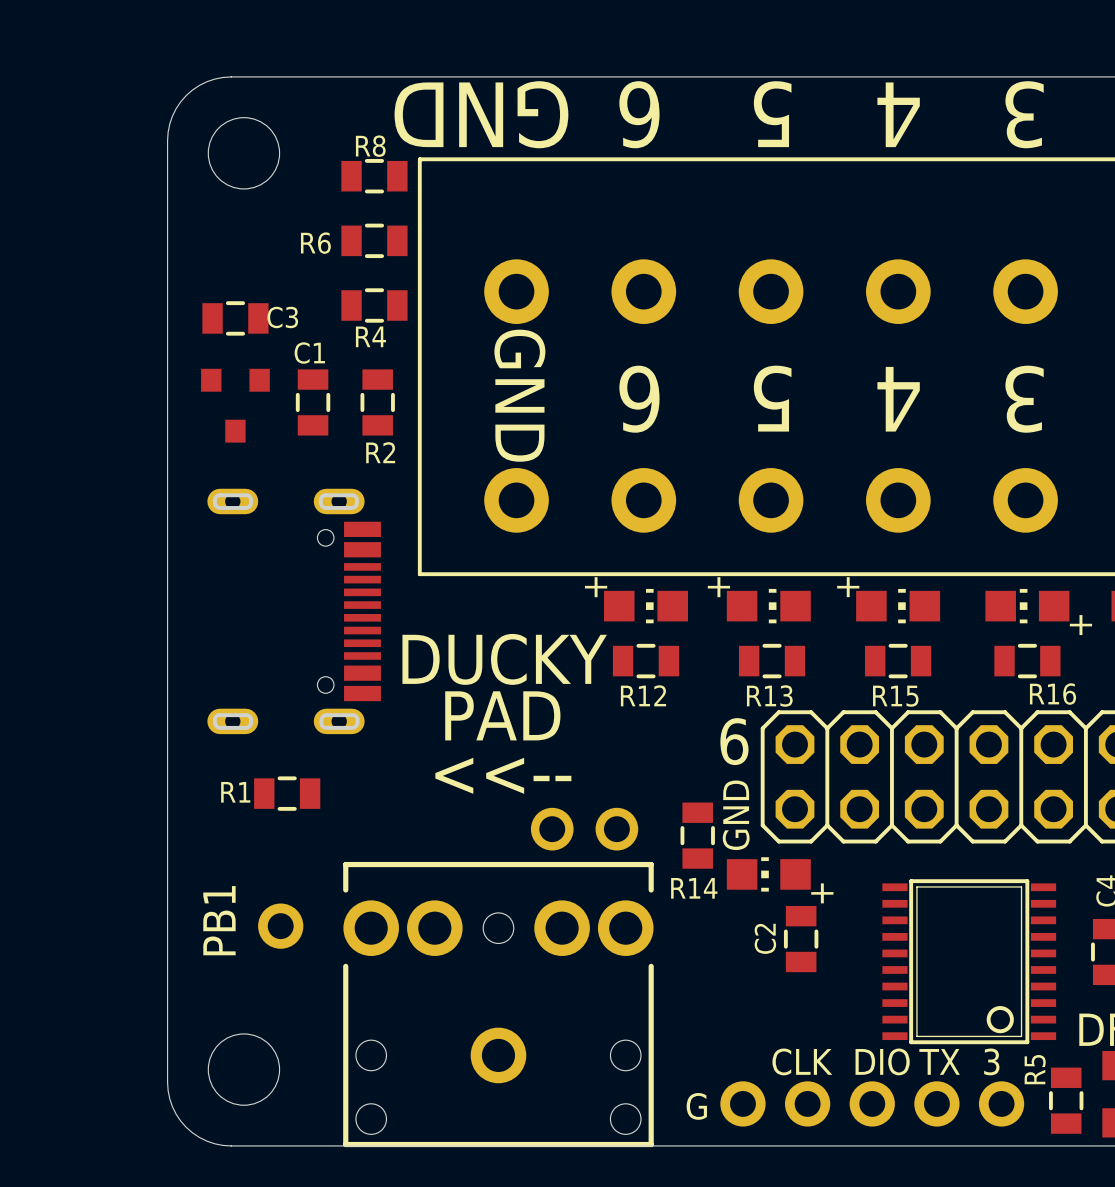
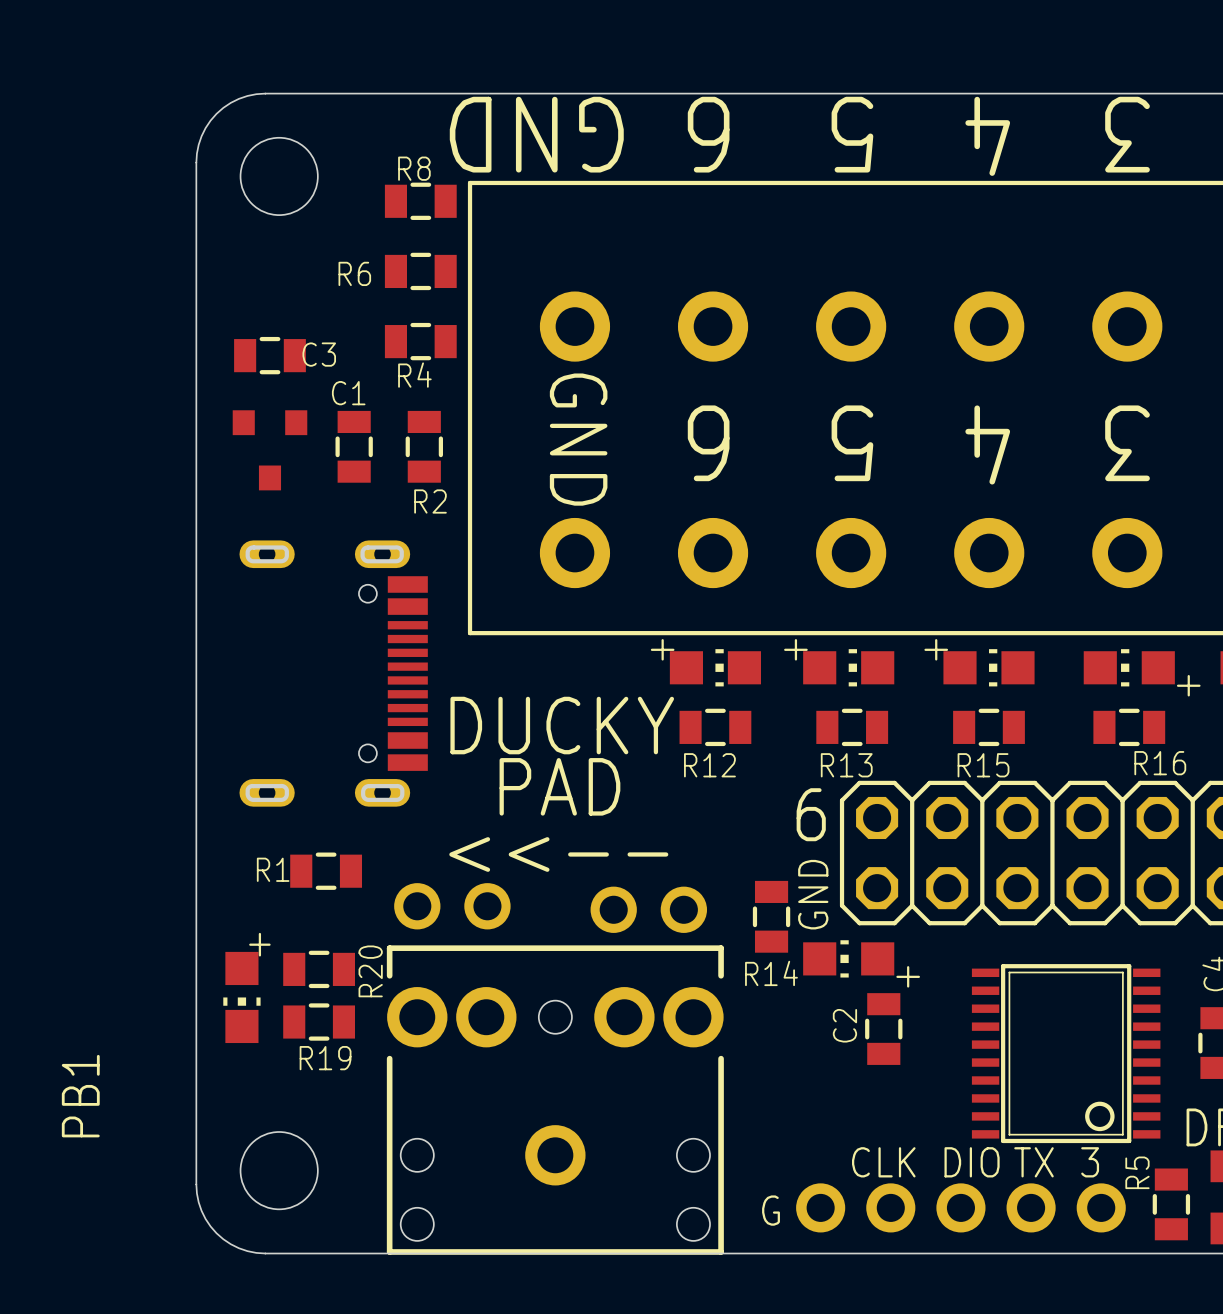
part: none -> (452, 906)
R20: none -> (319, 969)
part: none -> (241, 997)
text position: PB1 (219, 920) -> PB1 (80, 1096)
part: (280, 926) -> none
R19: none -> (319, 1022)

